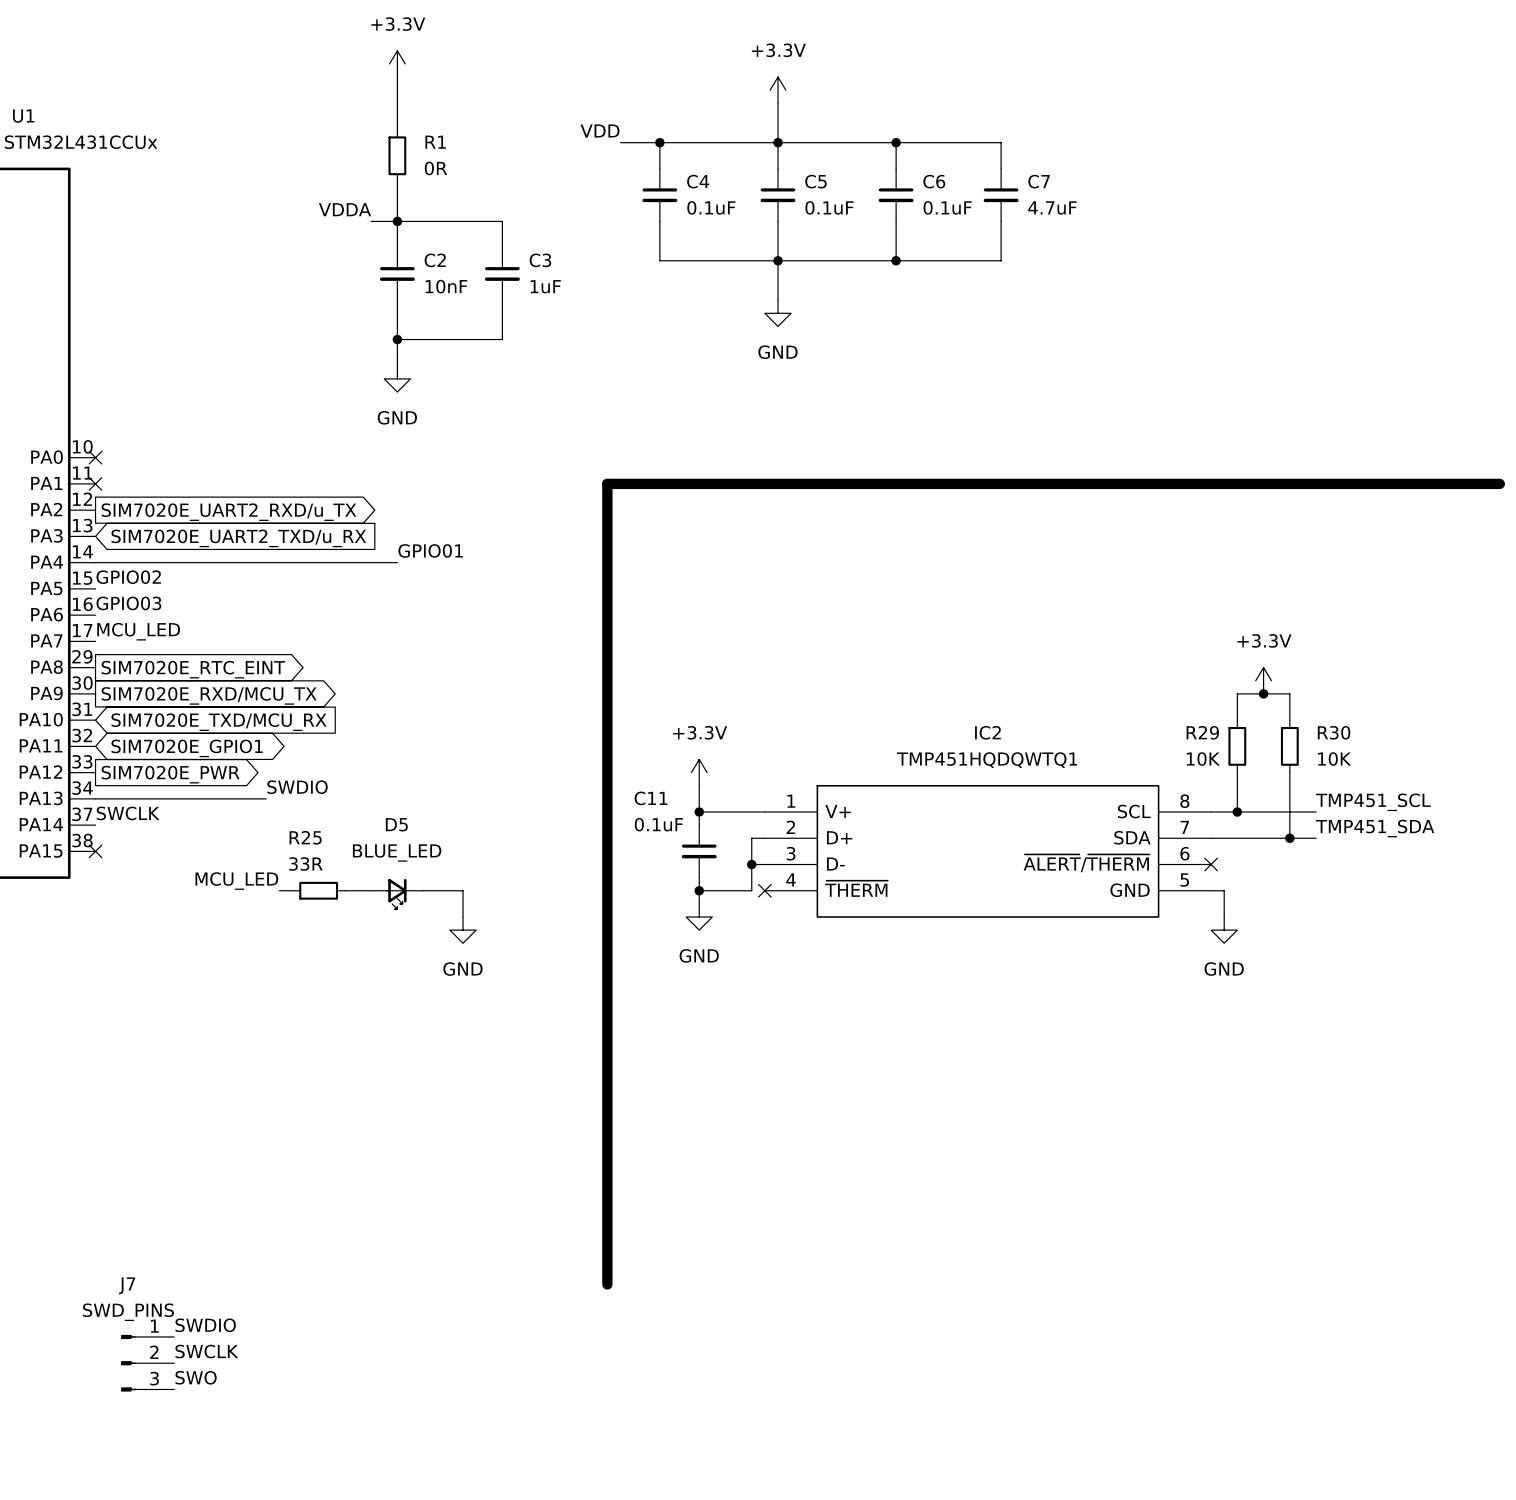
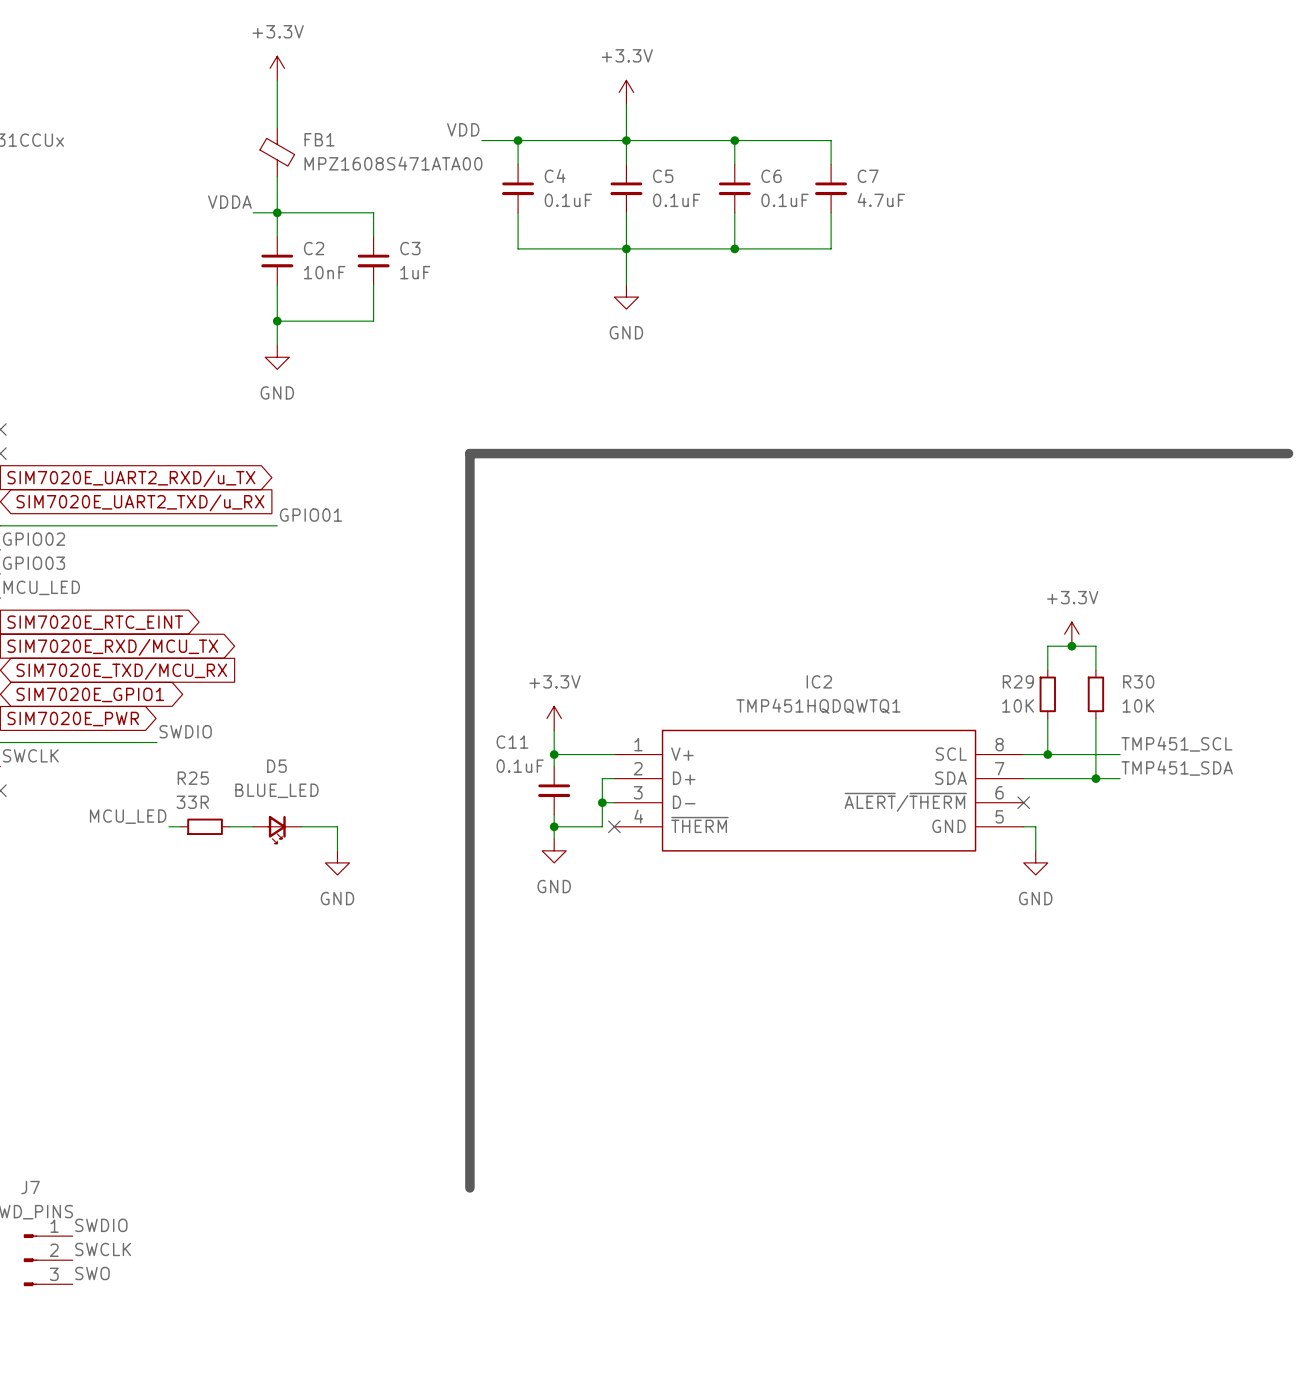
R1: 0R (397, 155) -> none
FB1: none -> MPZ1608S471ATA00 (277, 152)

